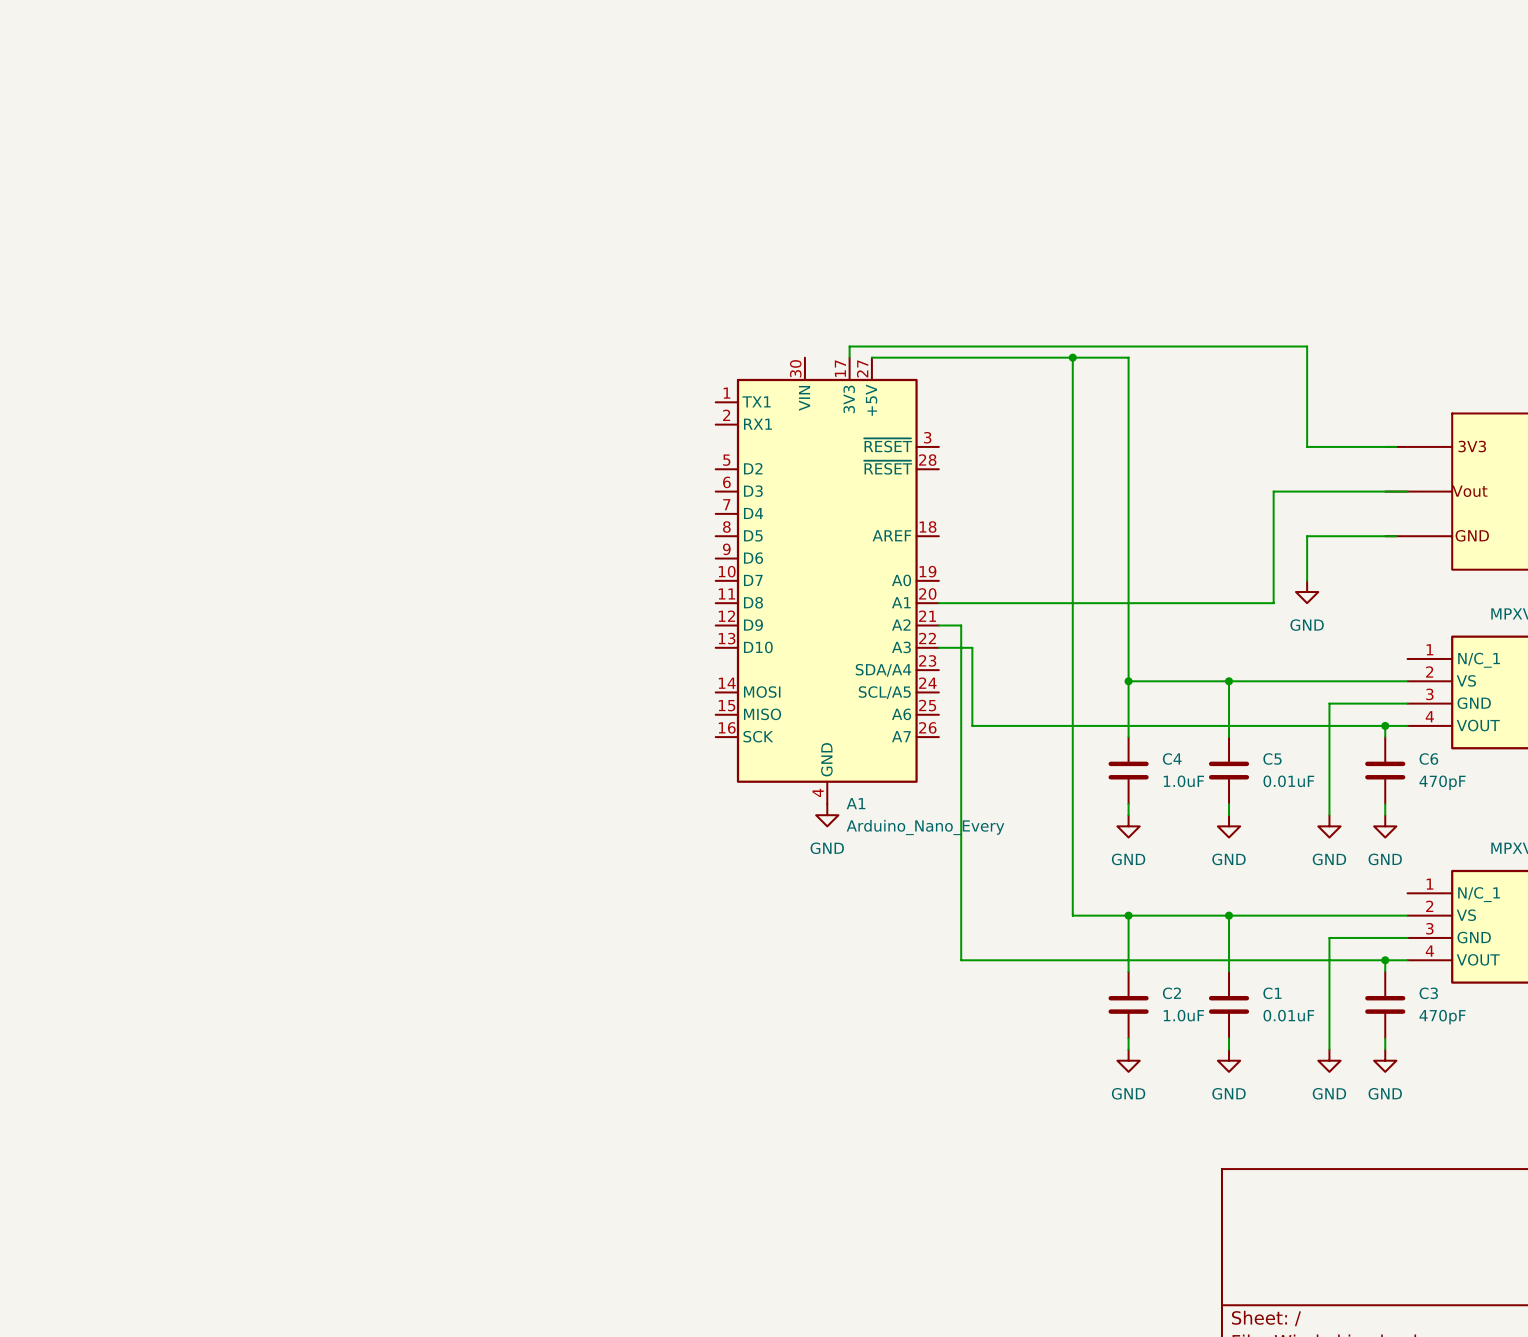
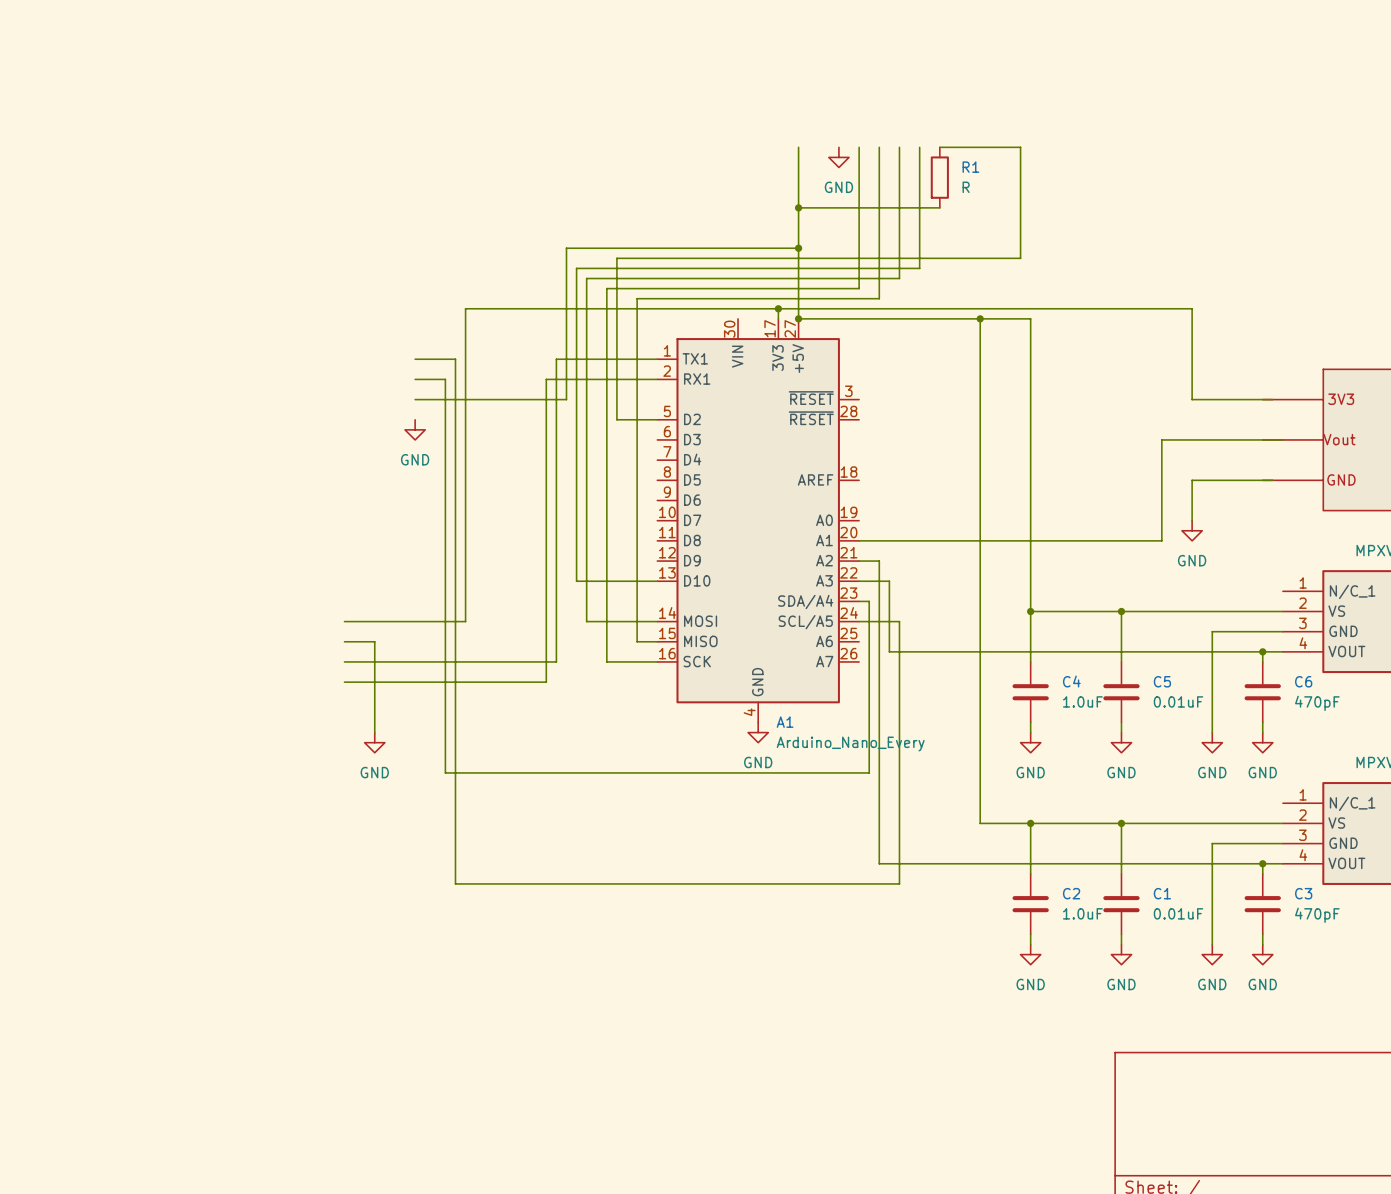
wire: none -> (798, 147) (798, 318)
wire: none -> (859, 147) (859, 288) (606, 288) (606, 661) (657, 661)
wire: none -> (879, 147) (879, 298) (637, 298) (637, 641) (657, 641)
wire: none -> (899, 147) (899, 278) (586, 278) (586, 621) (657, 621)
wire: none -> (919, 147) (919, 268) (576, 268) (576, 581) (657, 581)
wire: none -> (939, 147) (1020, 147) (1020, 258) (616, 258) (616, 419) (657, 419)
power symbol: none -> GND (838, 157)
R1: none -> R (939, 177)
wire: none -> (798, 207) (939, 207)
junction: none -> (798, 207)
wire: none -> (798, 248) (566, 248) (566, 399) (415, 399)
junction: none -> (798, 248)
wire: none -> (778, 308) (465, 308) (465, 621) (344, 621)
junction: none -> (778, 308)
junction: none -> (798, 318)
wire: none -> (415, 359) (455, 359) (455, 883) (899, 883) (899, 621) (859, 621)
wire: none -> (657, 359) (556, 359) (556, 661) (344, 661)
wire: none -> (415, 379) (445, 379) (445, 772) (869, 772) (869, 601) (859, 601)
wire: none -> (657, 379) (546, 379) (546, 682) (344, 682)
power symbol: none -> GND (415, 429)
wire: none -> (344, 641) (374, 641) (374, 732)
power symbol: none -> GND (374, 742)

